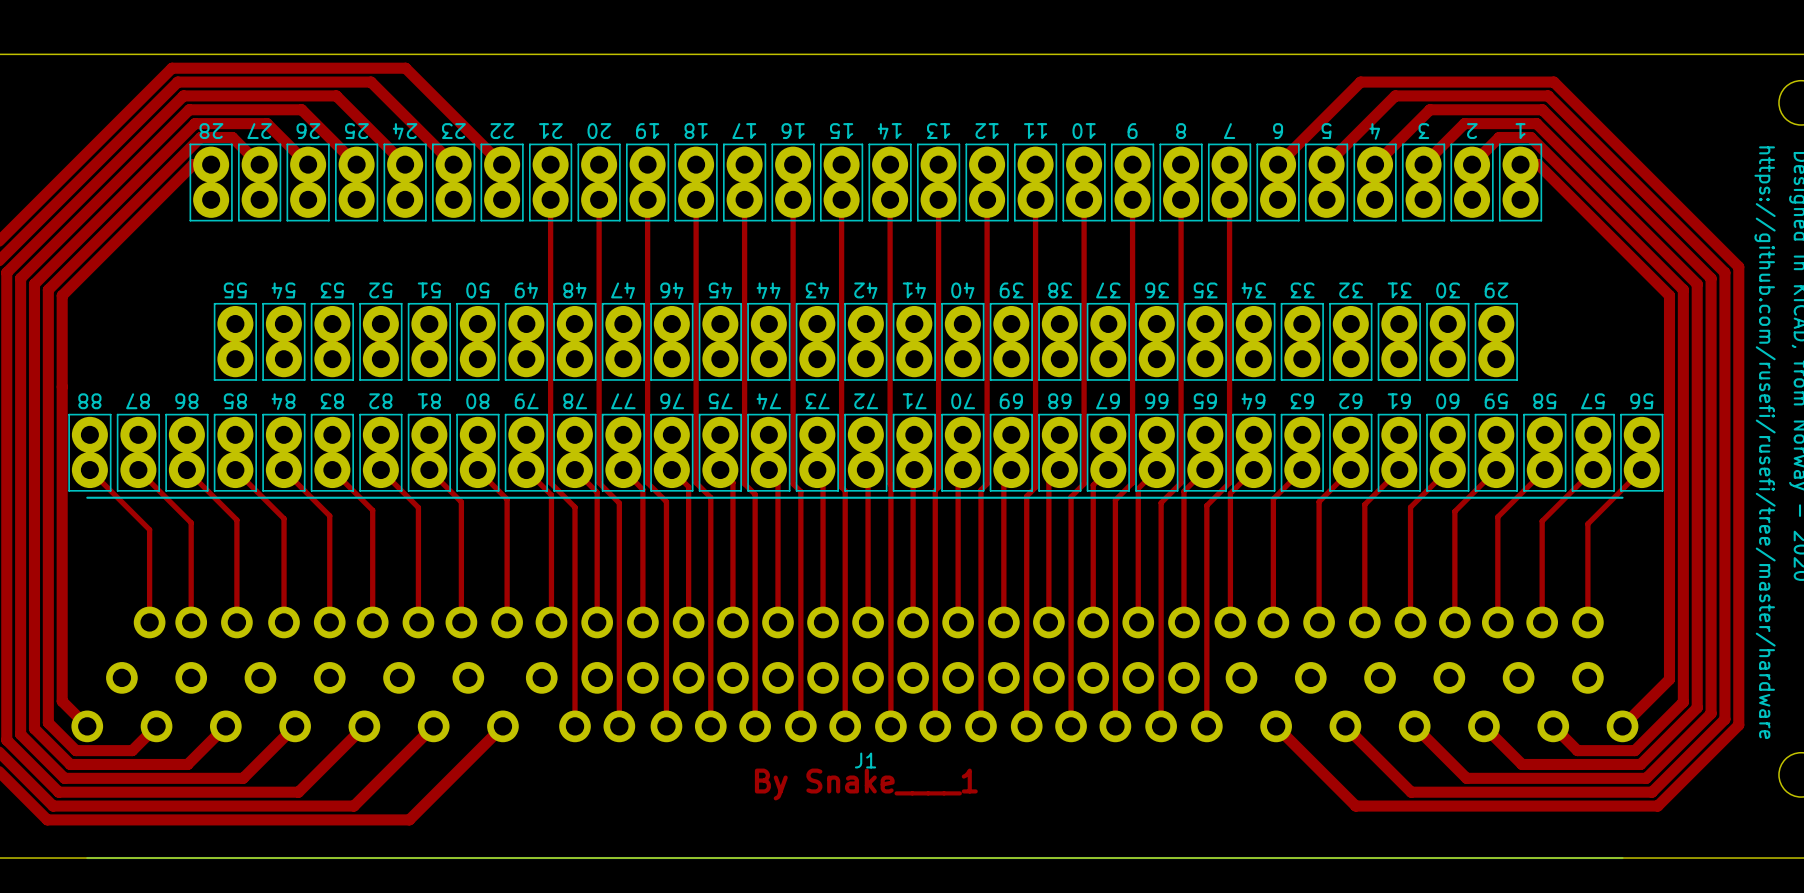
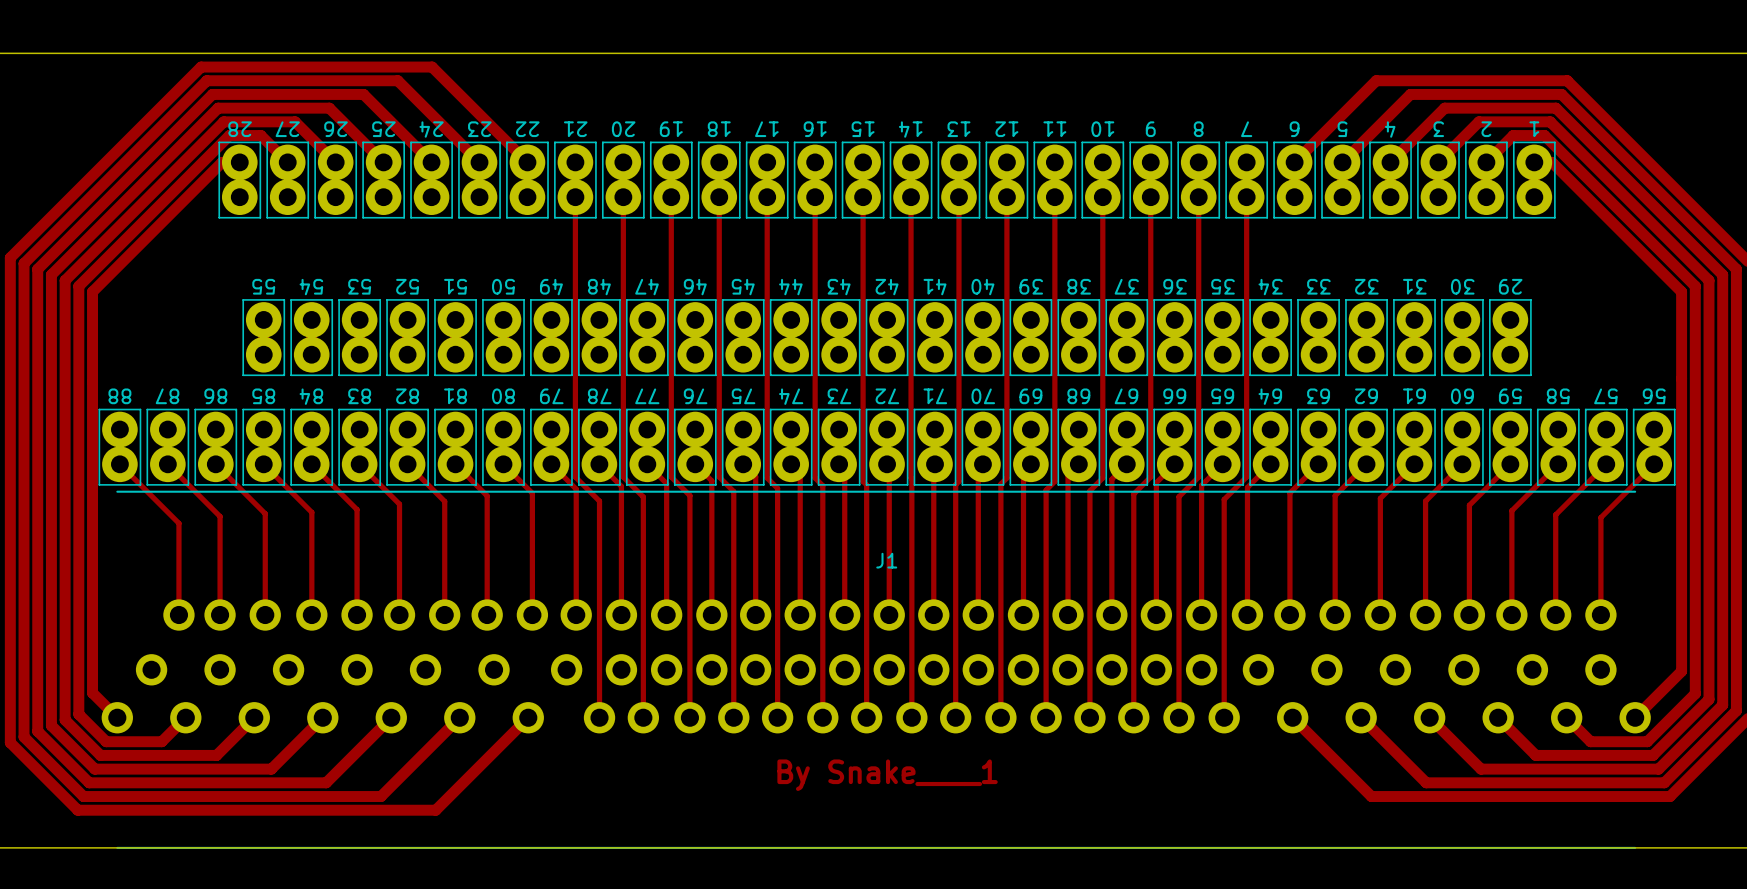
J1 name position: J1 (865, 760) -> J1 (886, 560)

